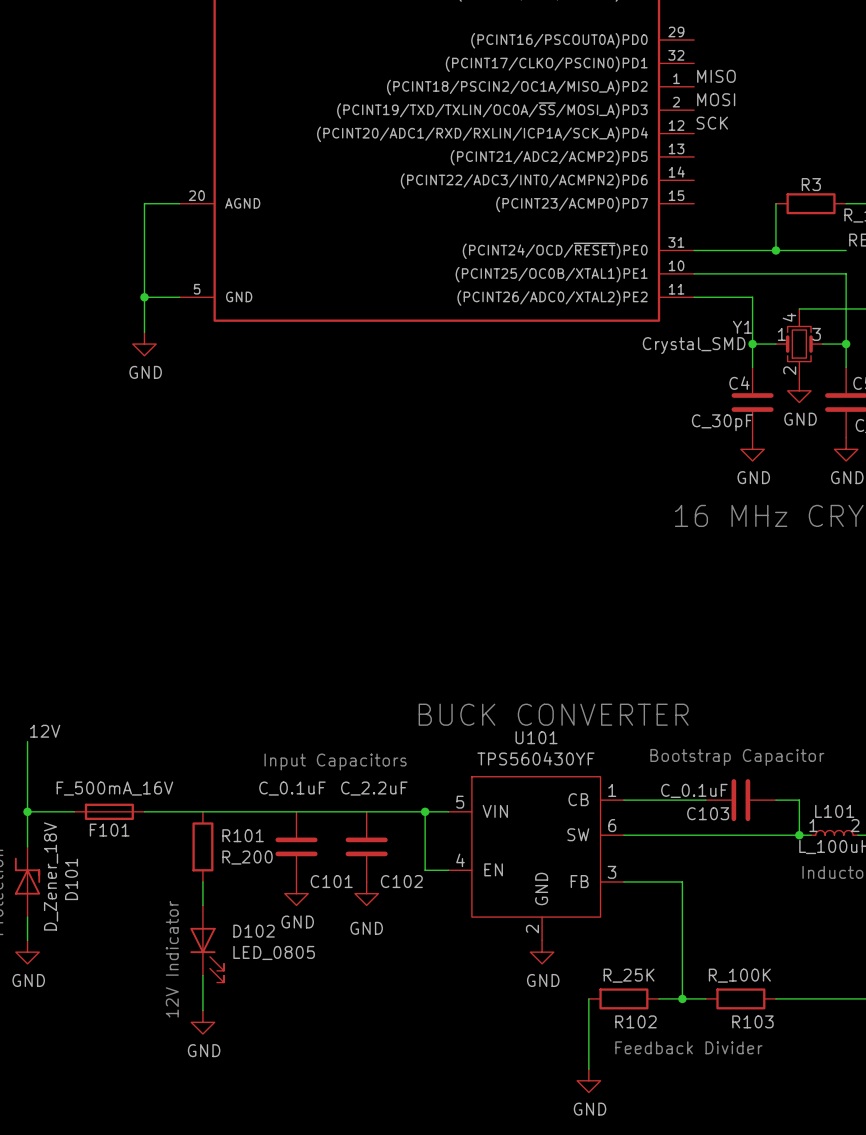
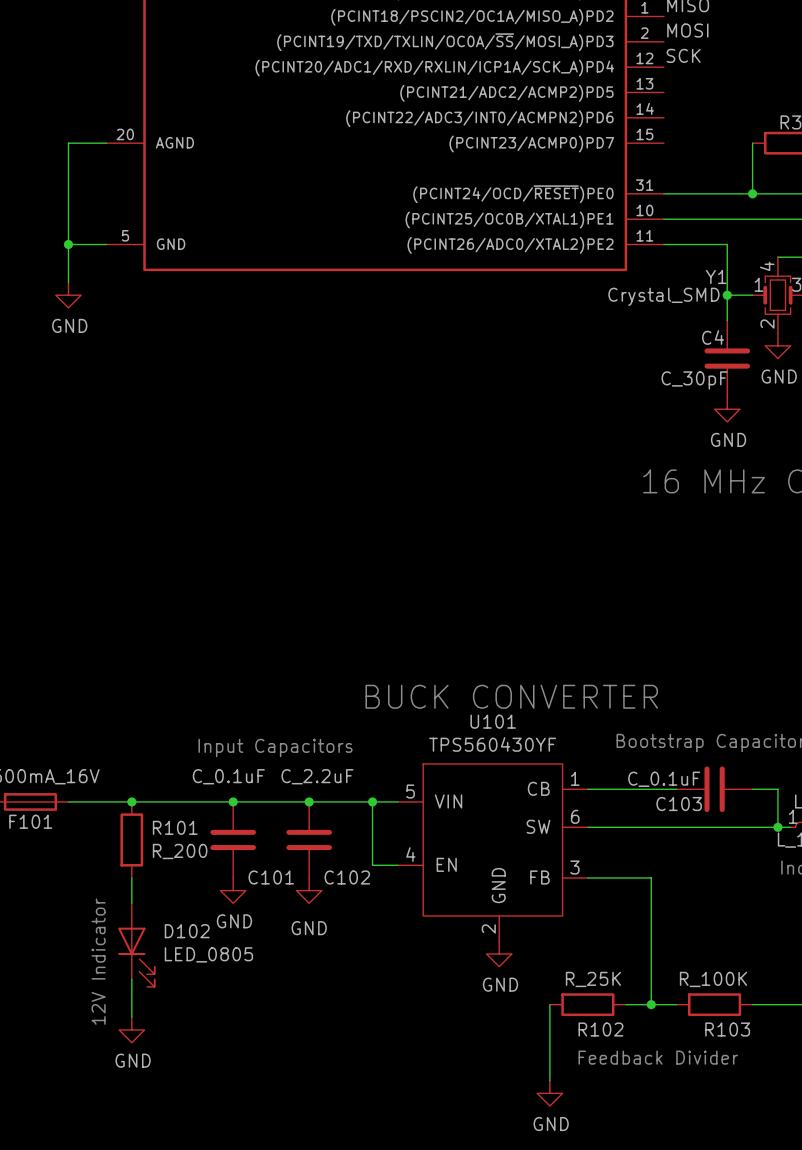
junction: none -> (131, 801)
junction: none -> (233, 801)
junction: none -> (309, 801)

